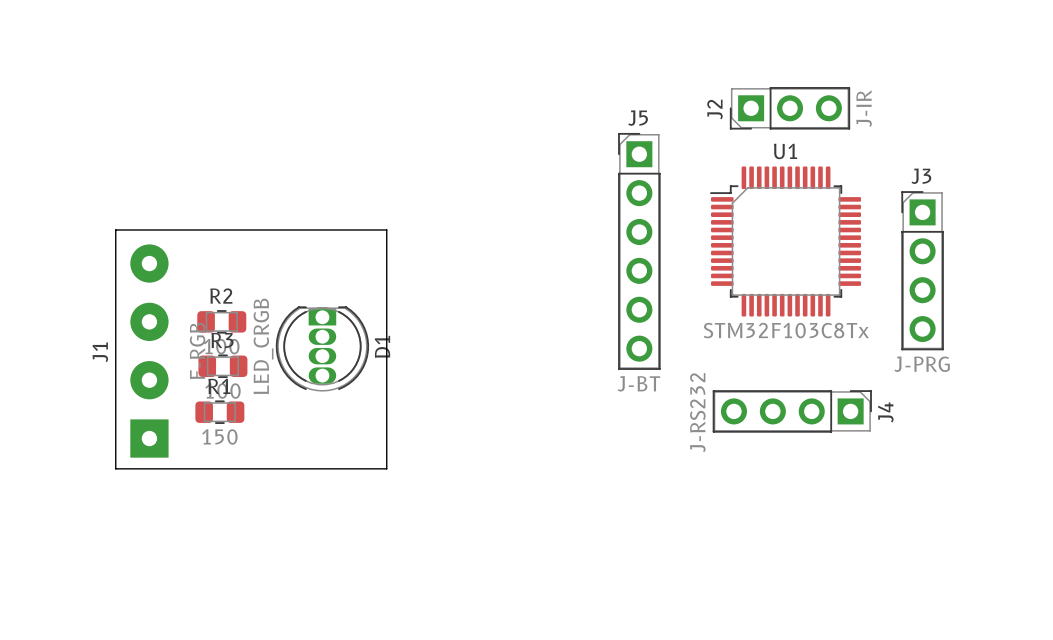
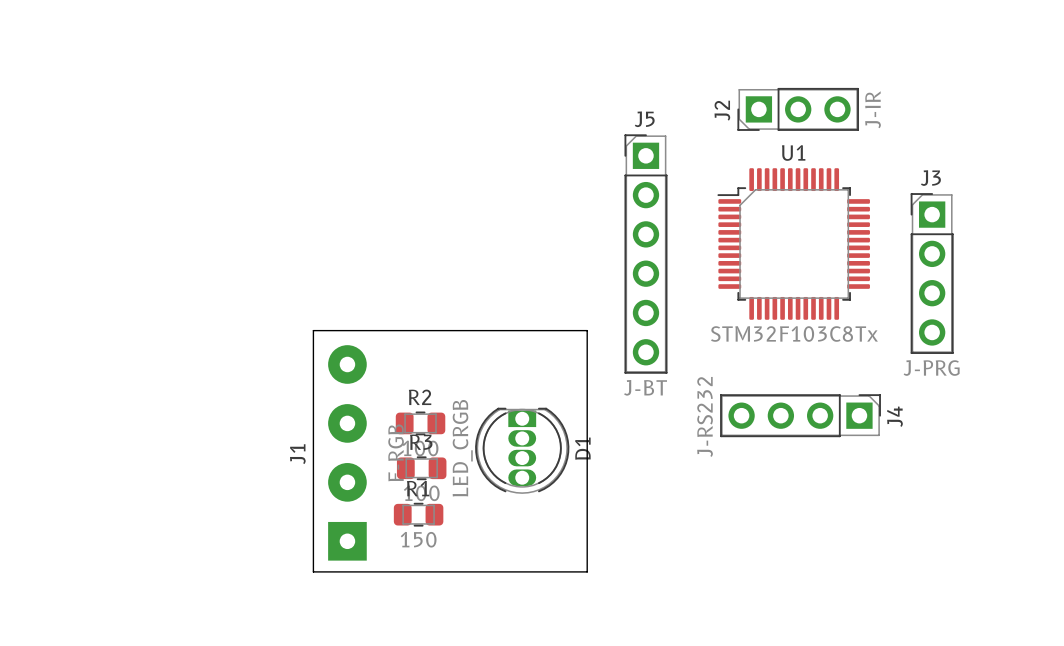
board edge: (115, 230) (115, 468) (386, 468) (386, 230) (115, 230) -> (313, 330) (313, 571) (587, 571) (587, 330) (313, 330)
R2 position: (221, 321) -> (420, 423)
D1 position: (322, 348) -> (522, 450)
J1 position: (149, 351) -> (347, 452)
R3 position: (222, 366) -> (421, 468)
R1 position: (219, 412) -> (418, 514)

